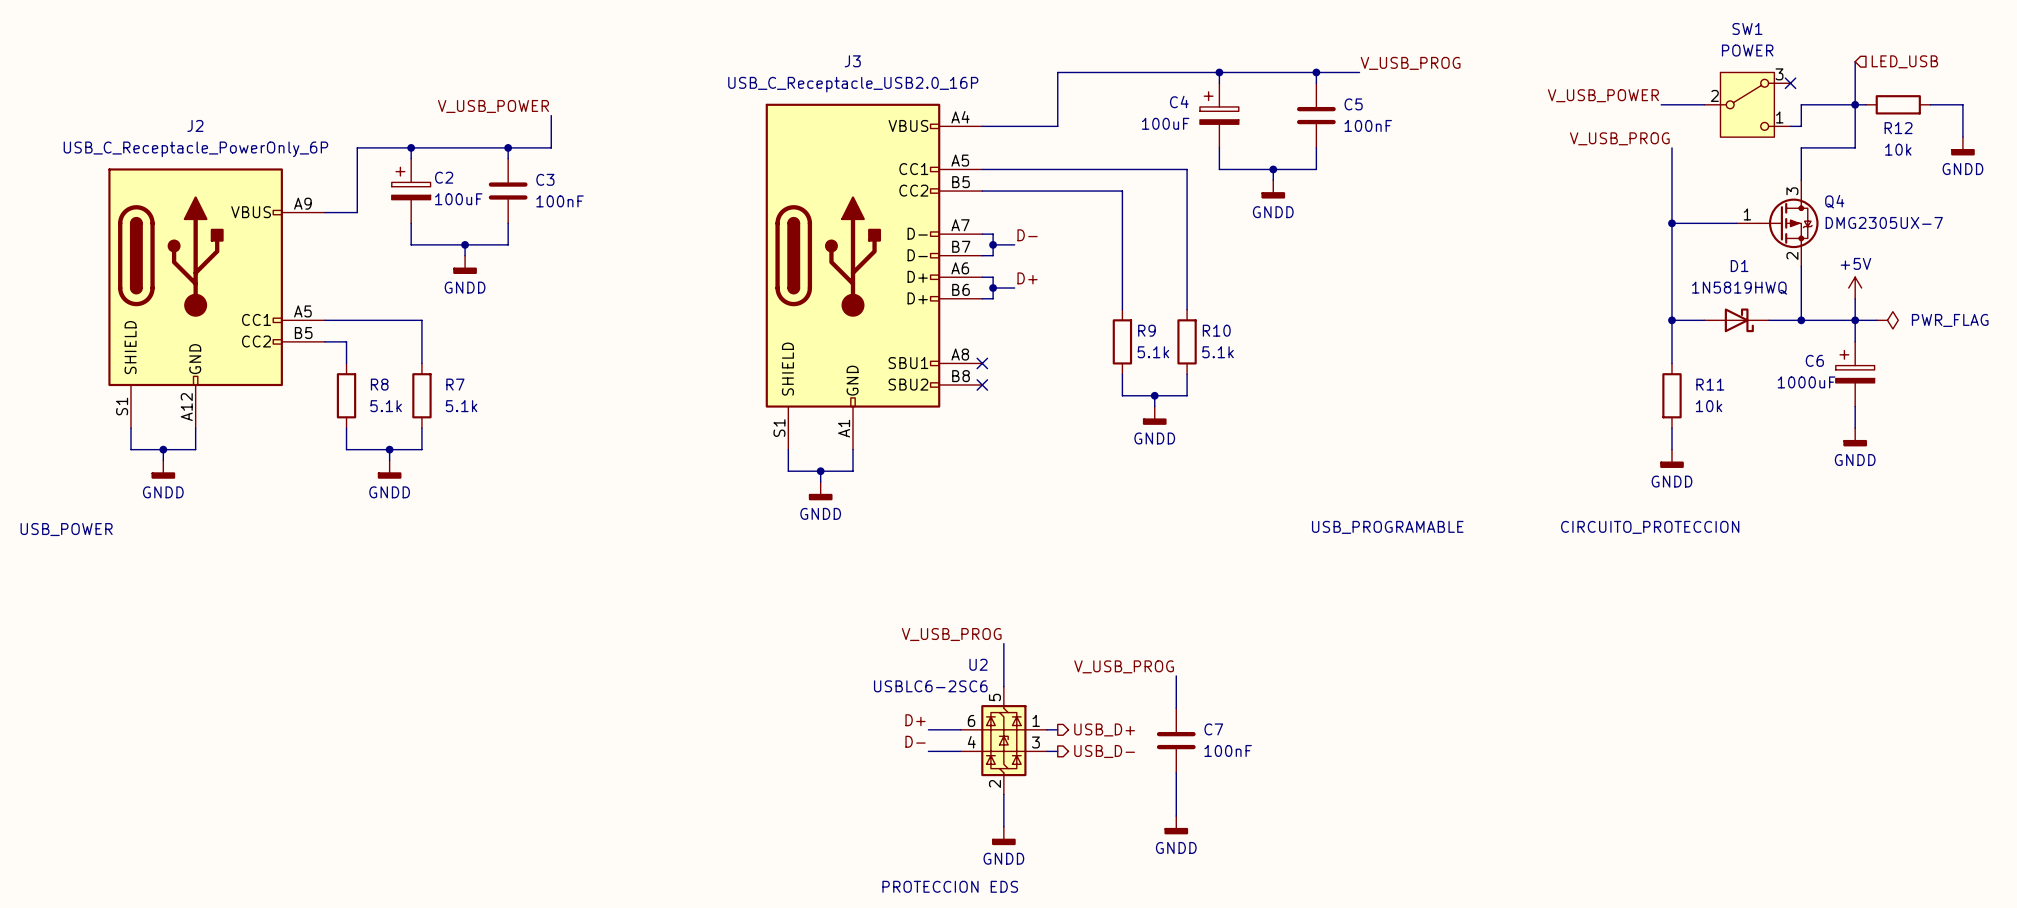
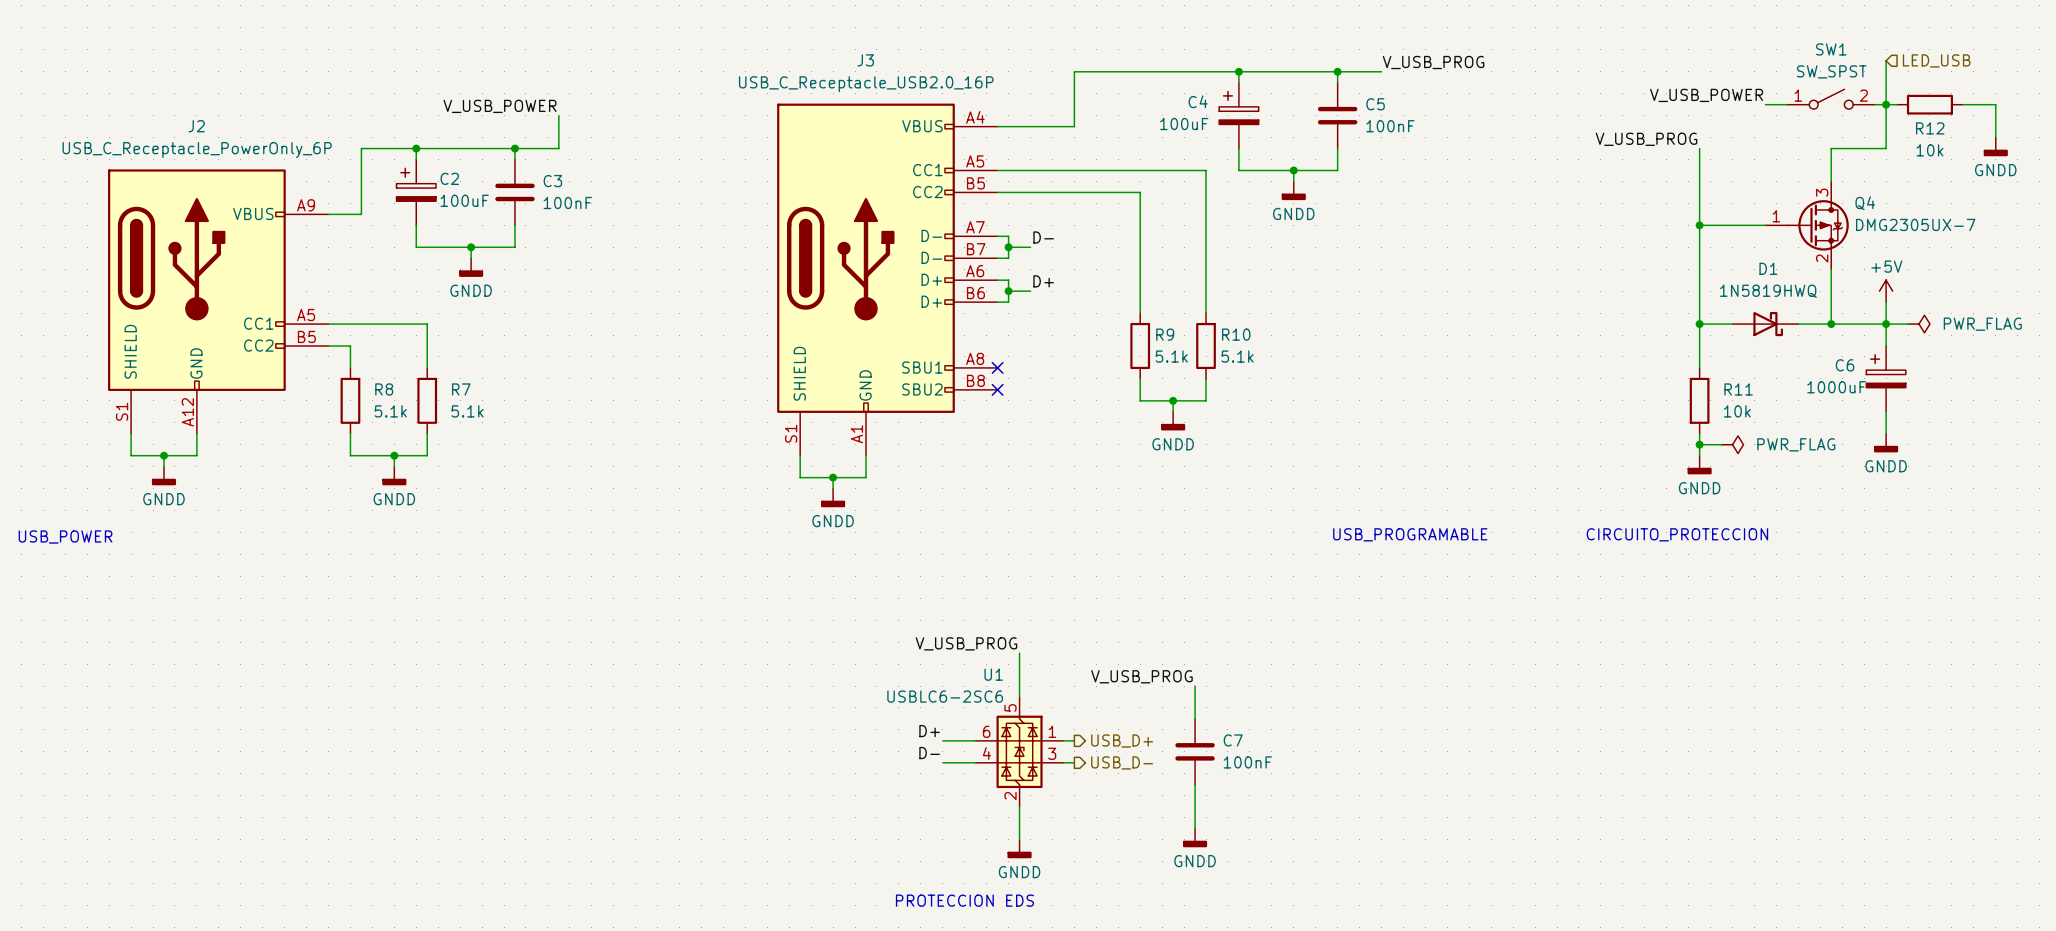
SW1 name position: SW1 (1747, 28) -> SW1 (1831, 49)
SW1 value: POWER (1747, 50) -> SW_SPST (1831, 71)
SW1 symbol: [1704, 72, 1791, 138] -> [1787, 89, 1876, 110]
no-connect mark: (1790, 83) -> none
label position: V_USB_POWER (1603, 95) -> V_USB_POWER (1706, 95)
wire: (1661, 104) (1704, 104) -> none
wire: (1844, 104) (1801, 104) (1801, 126) (1790, 126) -> none
wire: none -> (1699, 444) (1721, 444)
junction: none -> (1699, 444)
power symbol: none -> PWR_FLAG (1732, 444)
U2 name: U2 (978, 664) -> U1 (993, 674)

